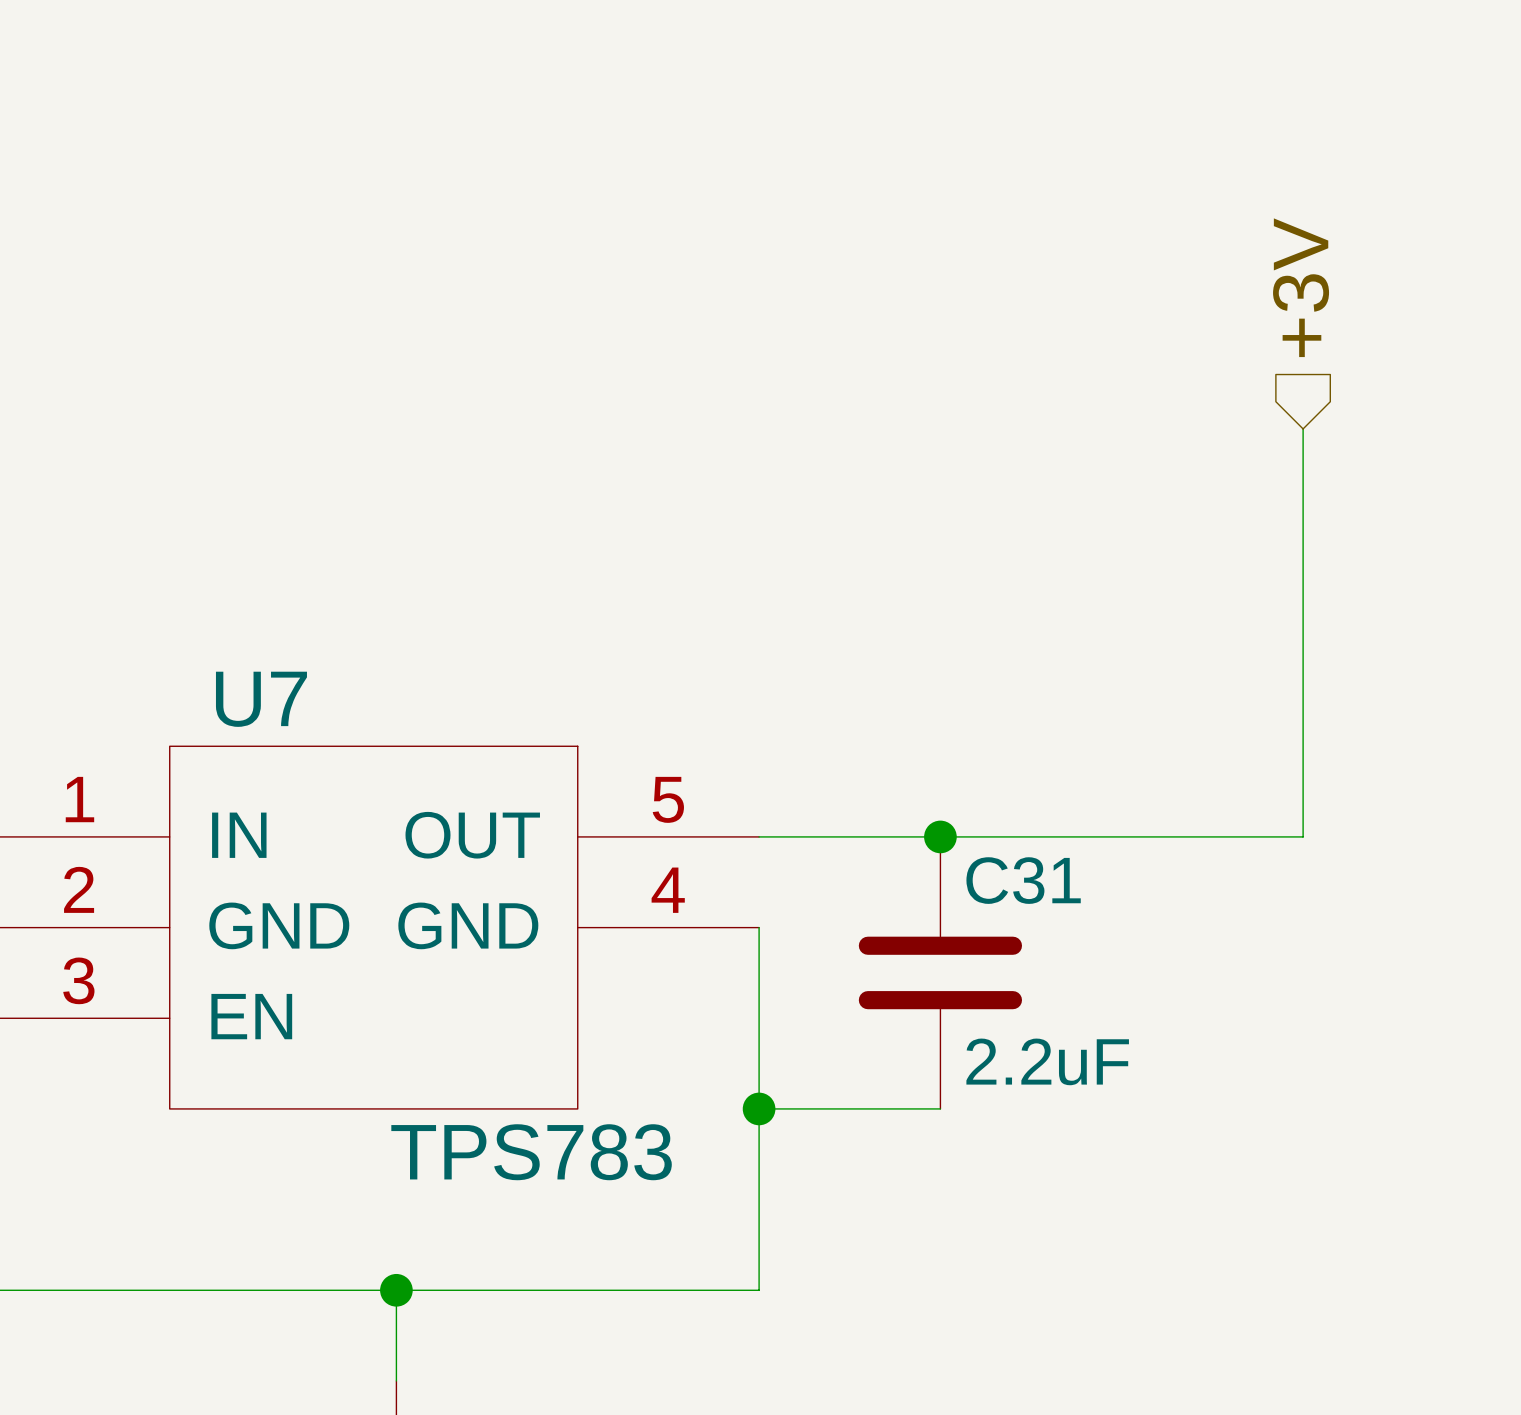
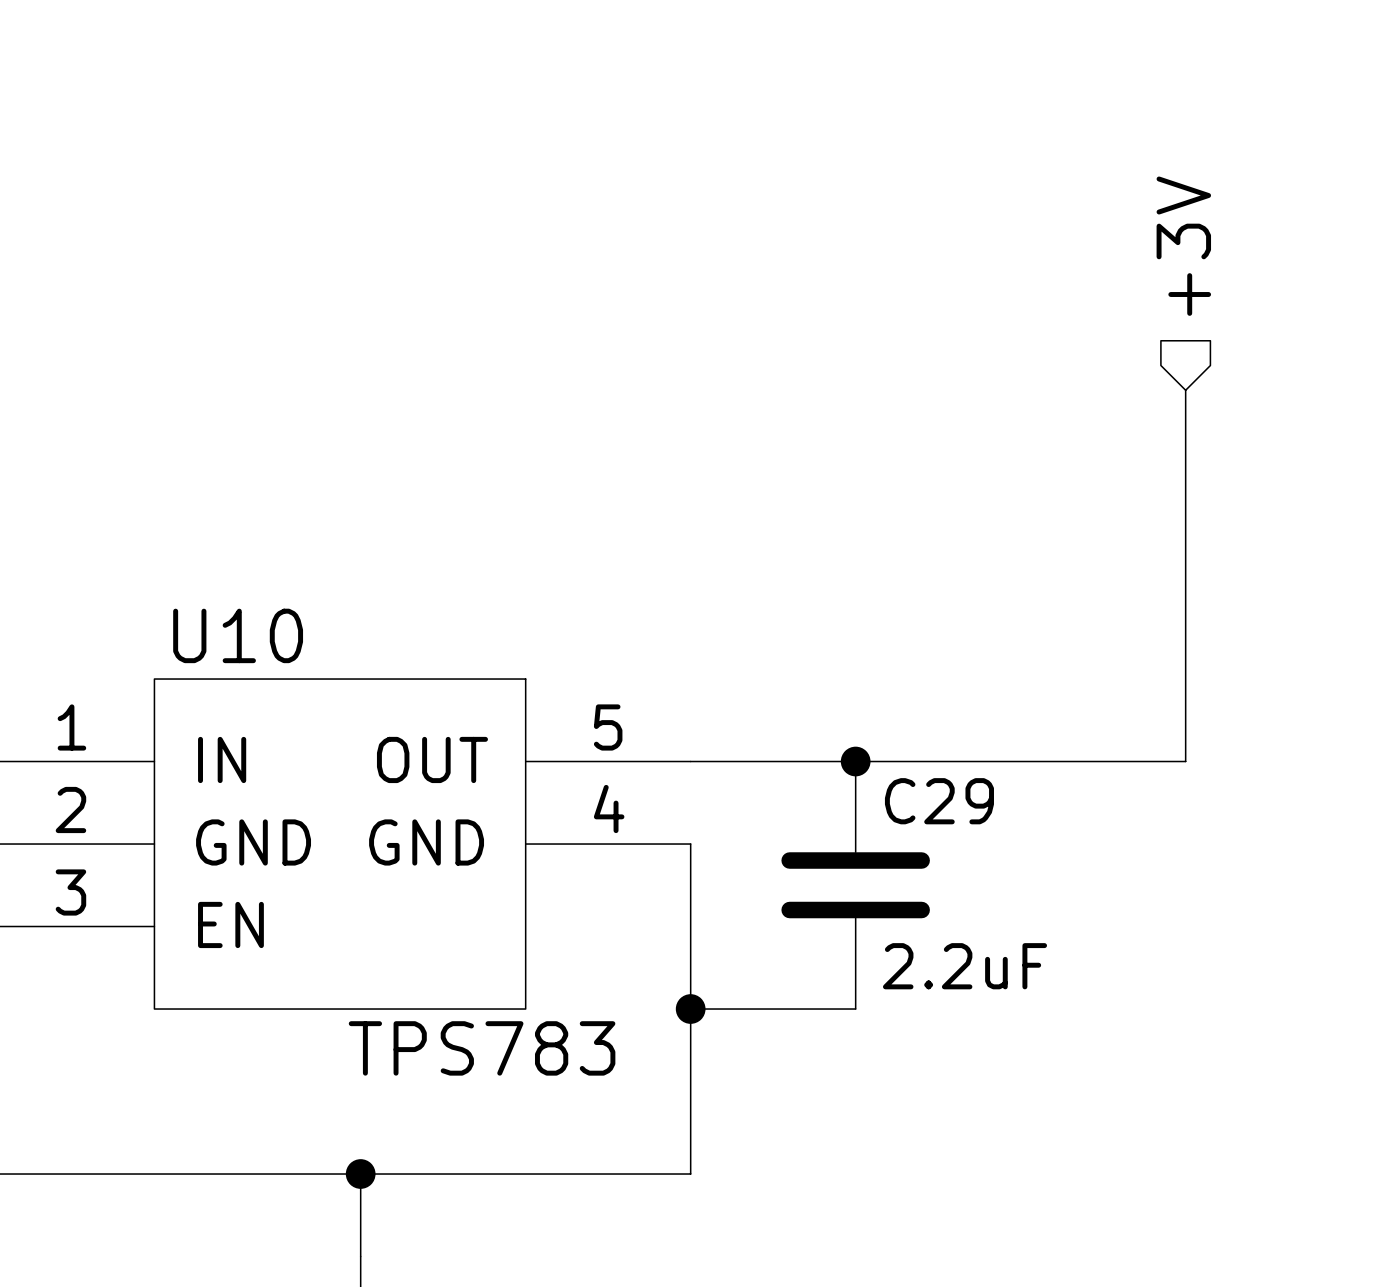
U7 name: U7 (261, 699) -> U10 (238, 635)
C31 name: C31 (1023, 880) -> C29 (939, 801)

